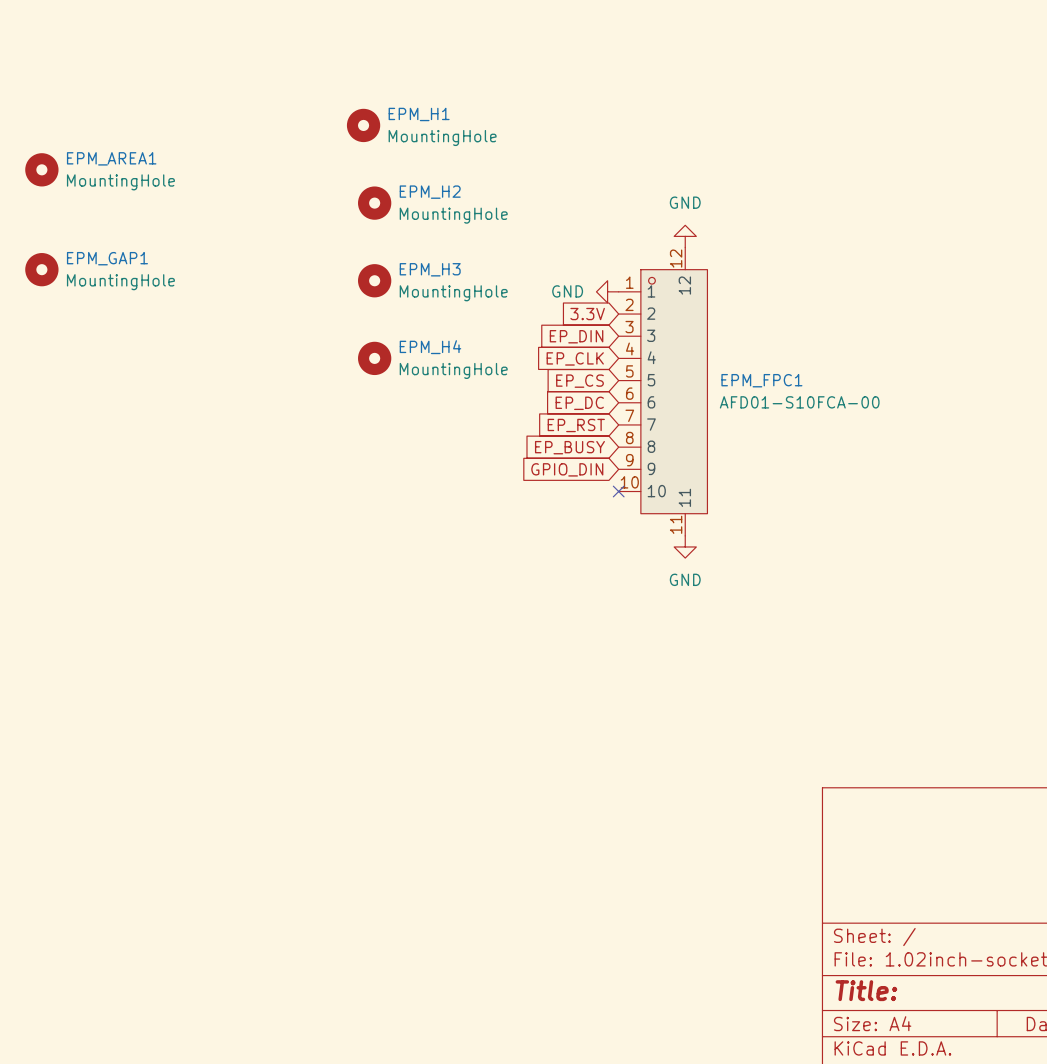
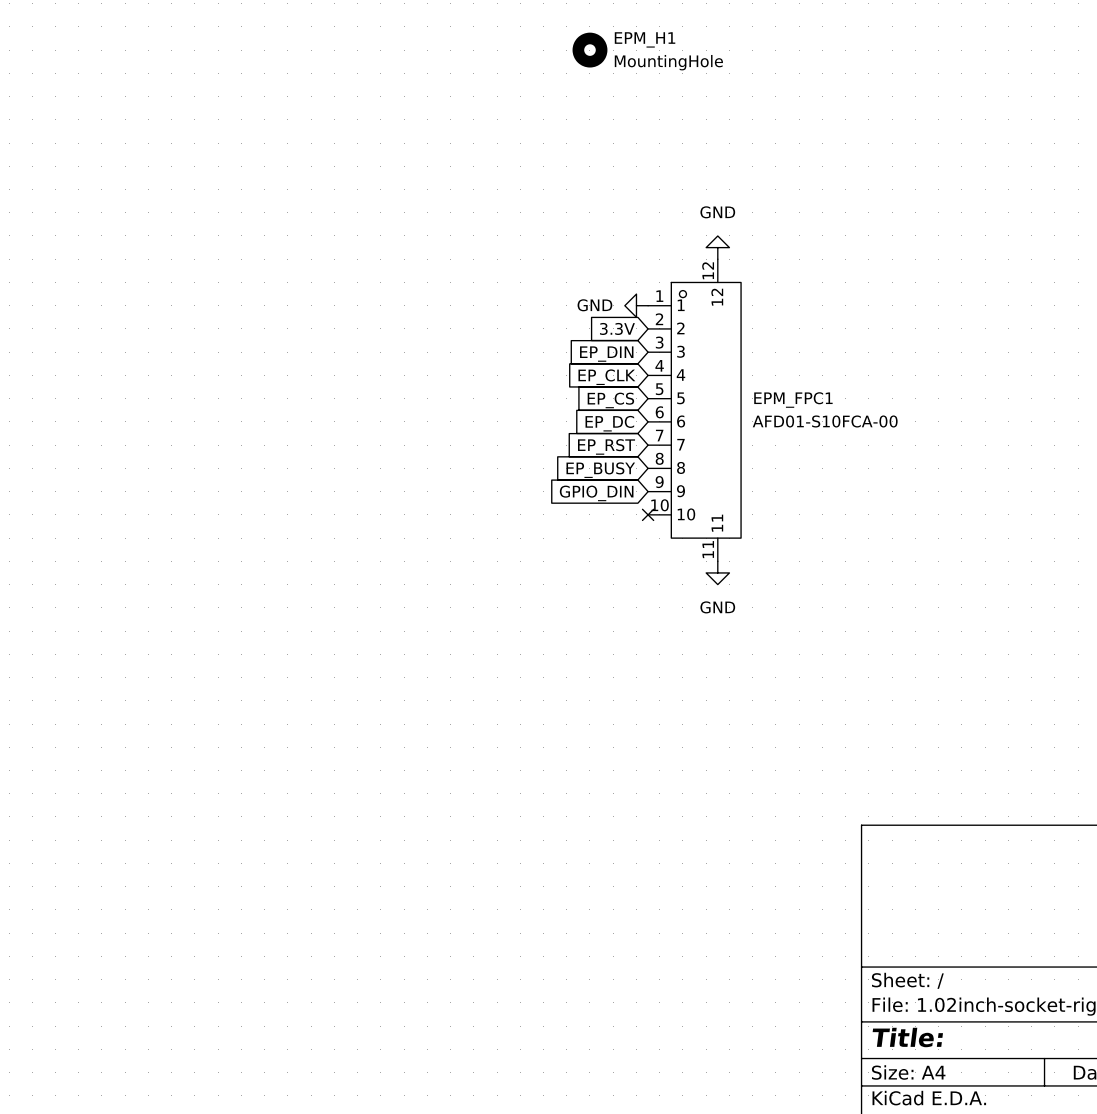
EPM_H1 position: (363, 125) -> (589, 50)
EPM_AREA1: MountingHole (41, 169) -> none
EPM_H2: MountingHole (374, 203) -> none
EPM_GAP1: MountingHole (41, 269) -> none
EPM_H3: MountingHole (374, 280) -> none
EPM_H4: MountingHole (374, 358) -> none

